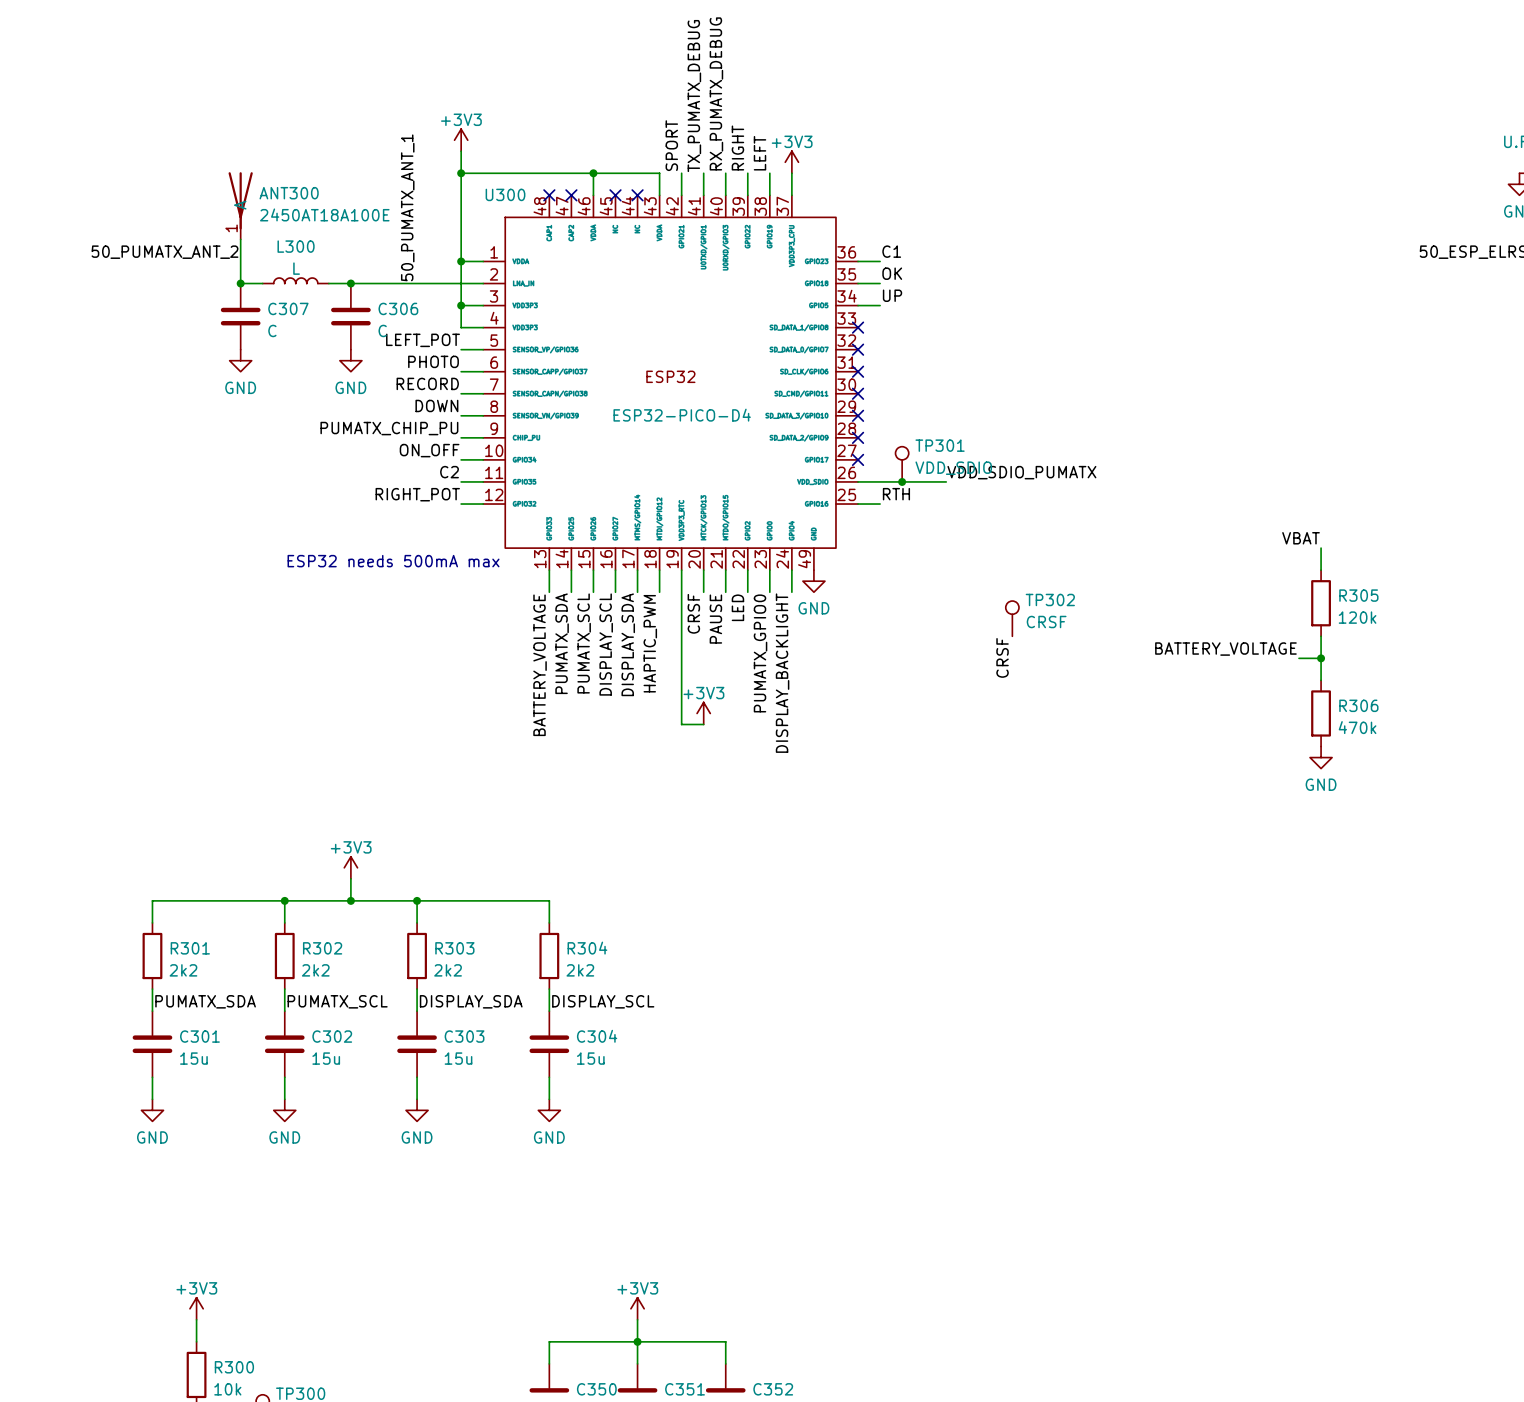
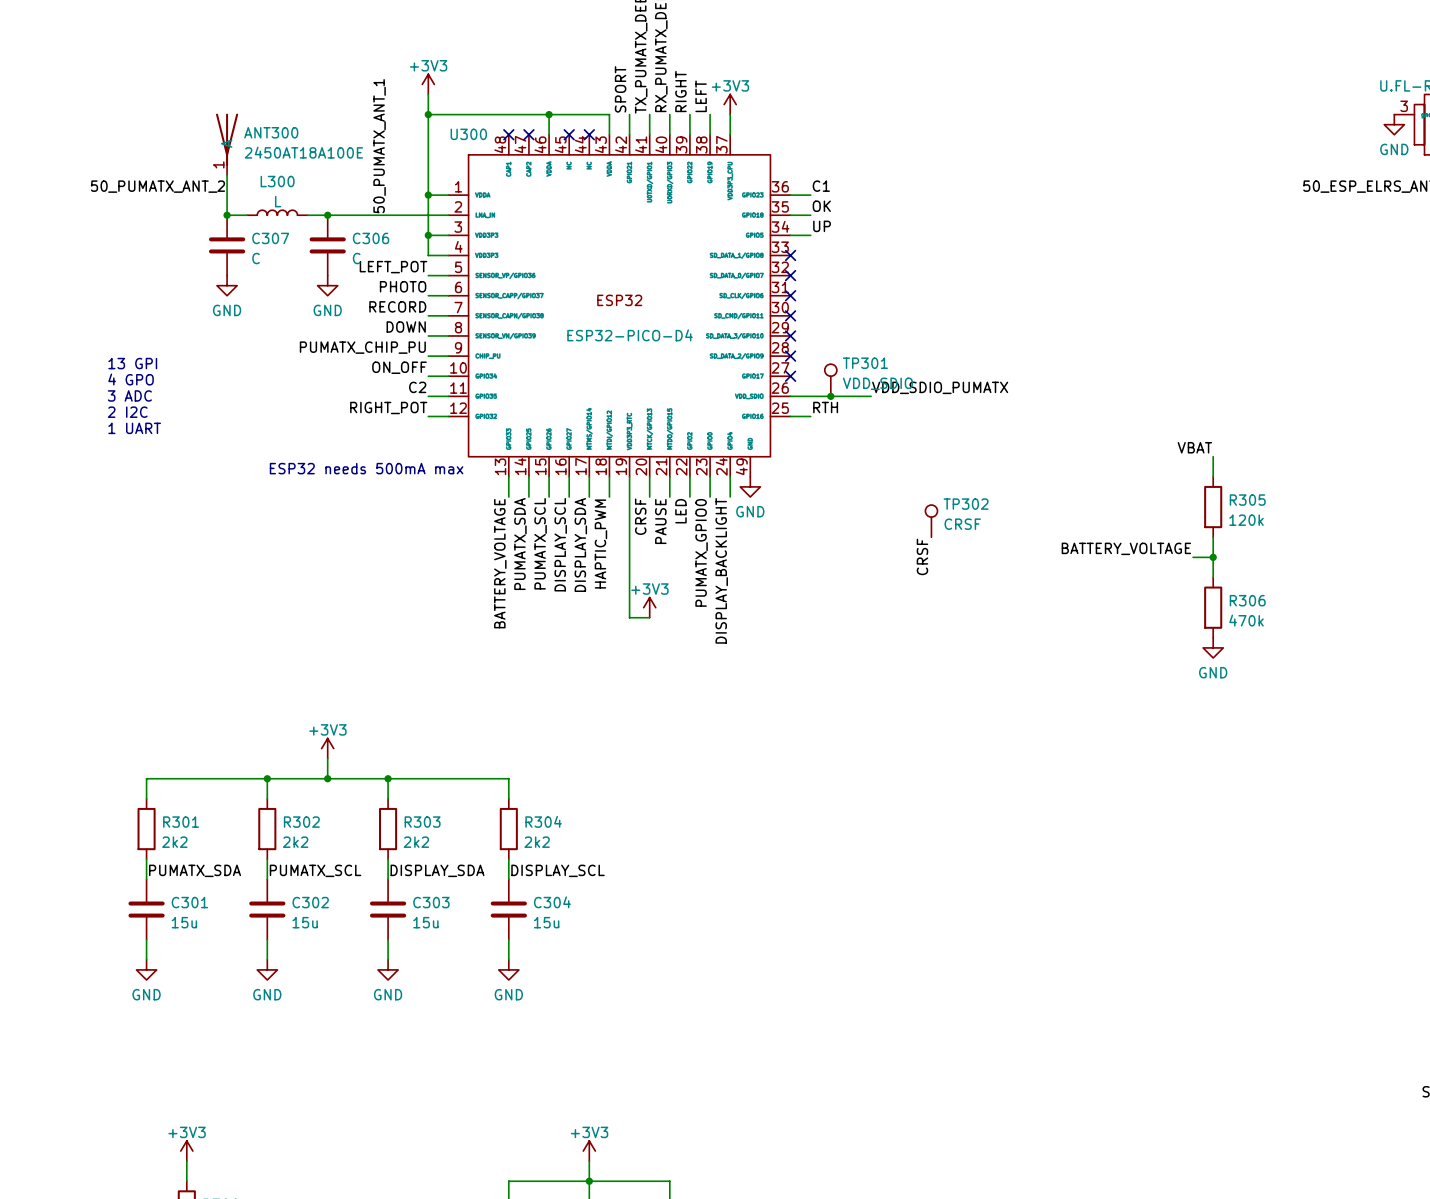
text: none -> 13 GPI (132, 363)
text: none -> 4 GPO (131, 379)
text: none -> 3 ADC (129, 395)
text: none -> 2 I2C (127, 412)
text: none -> 1 UART (134, 428)

